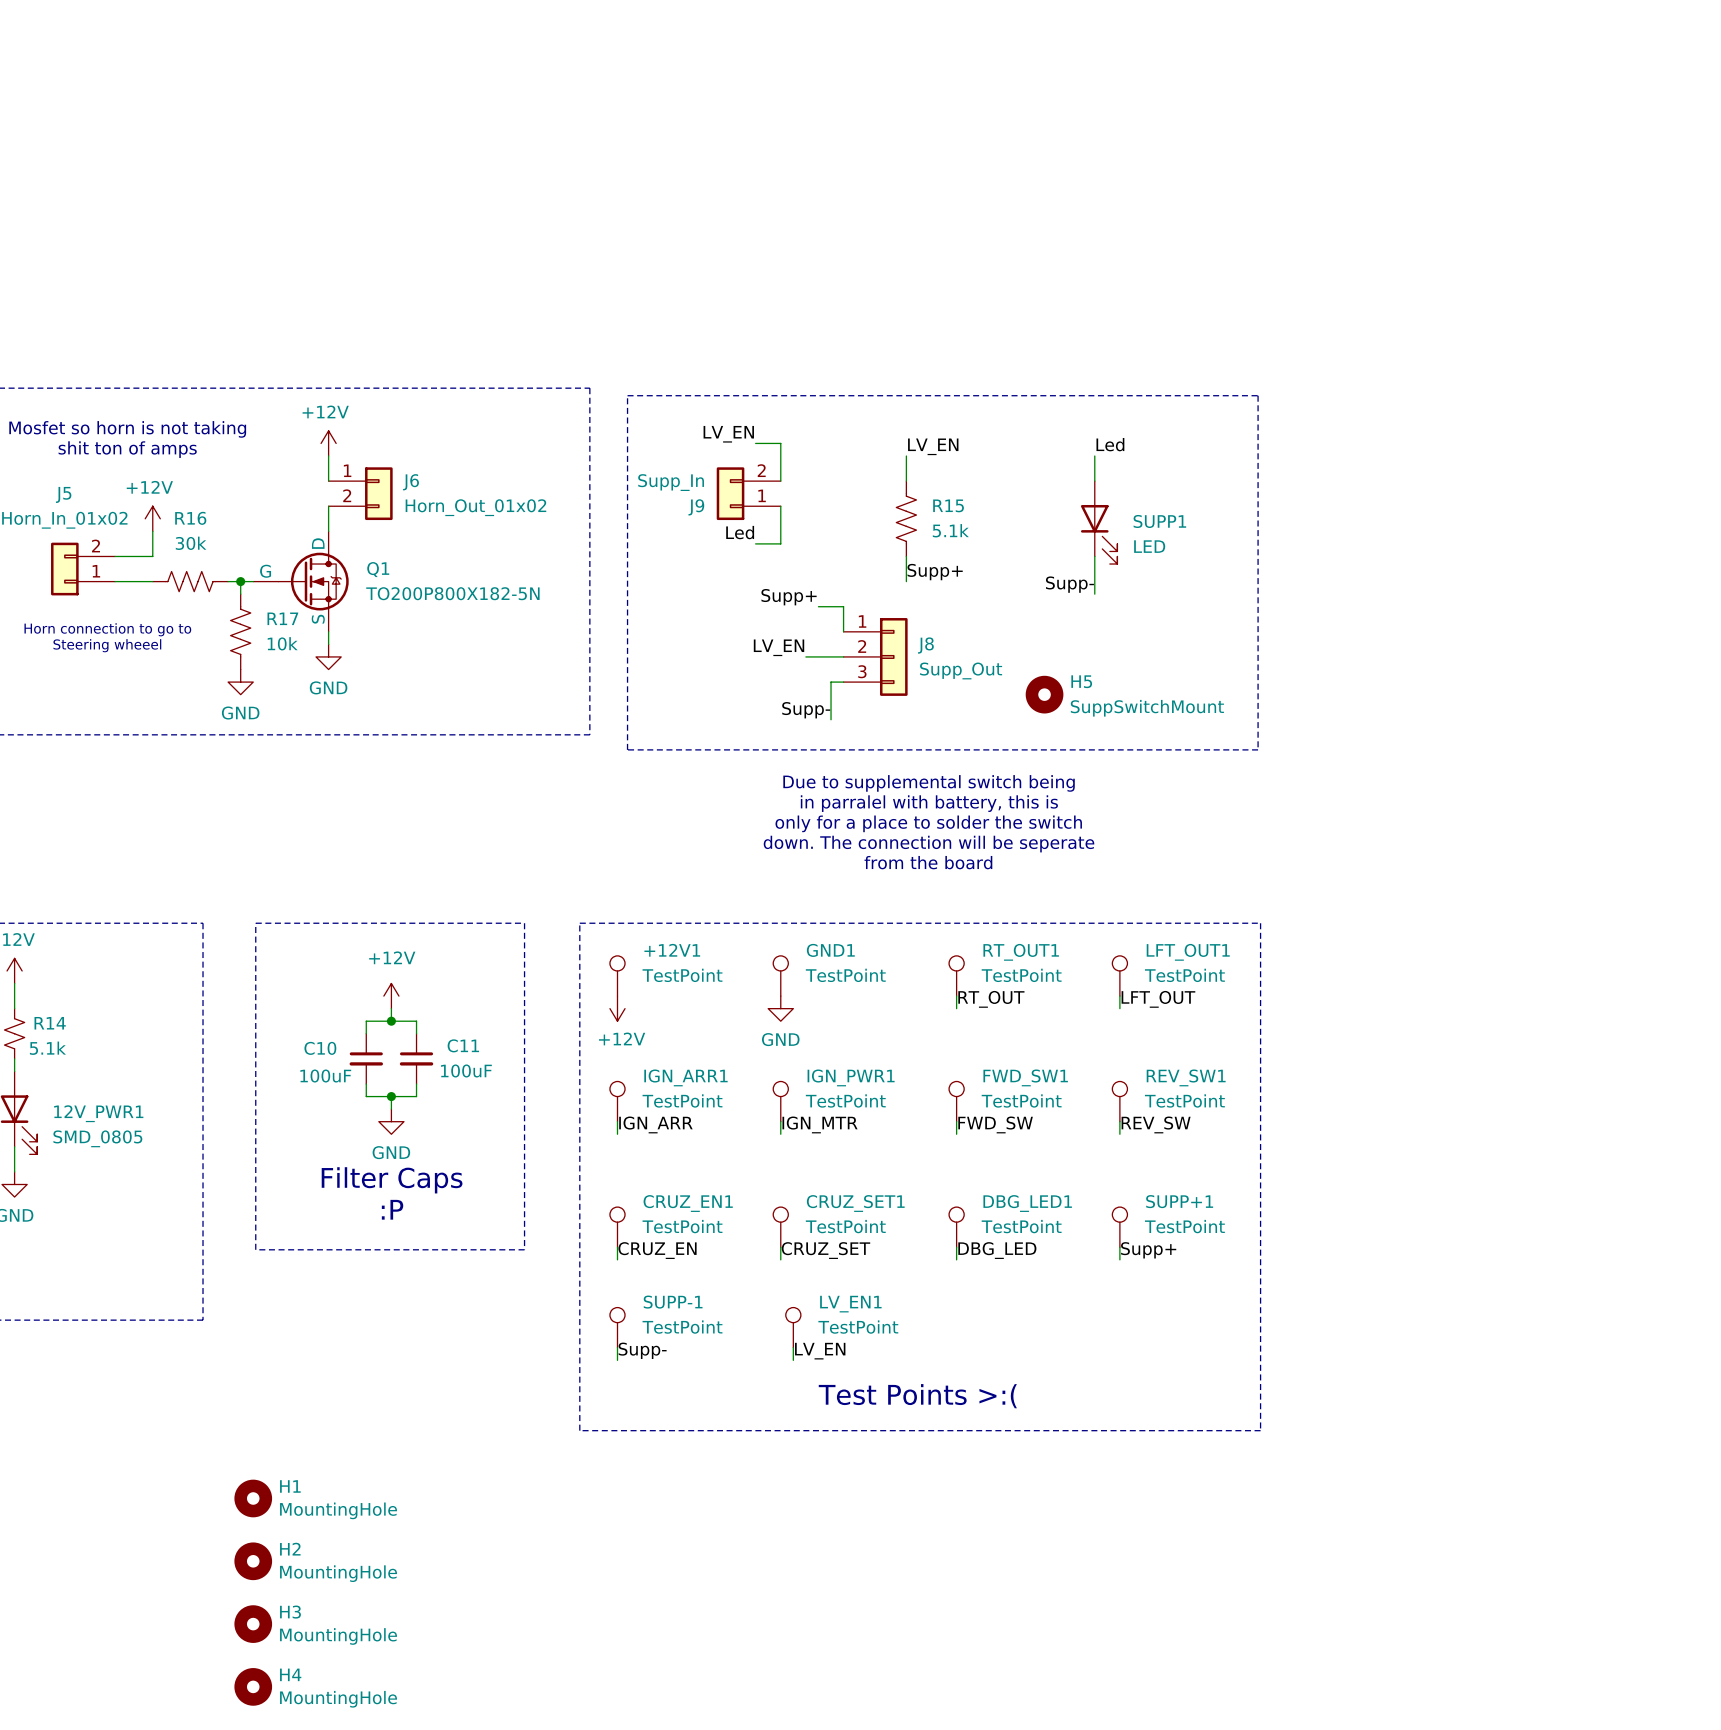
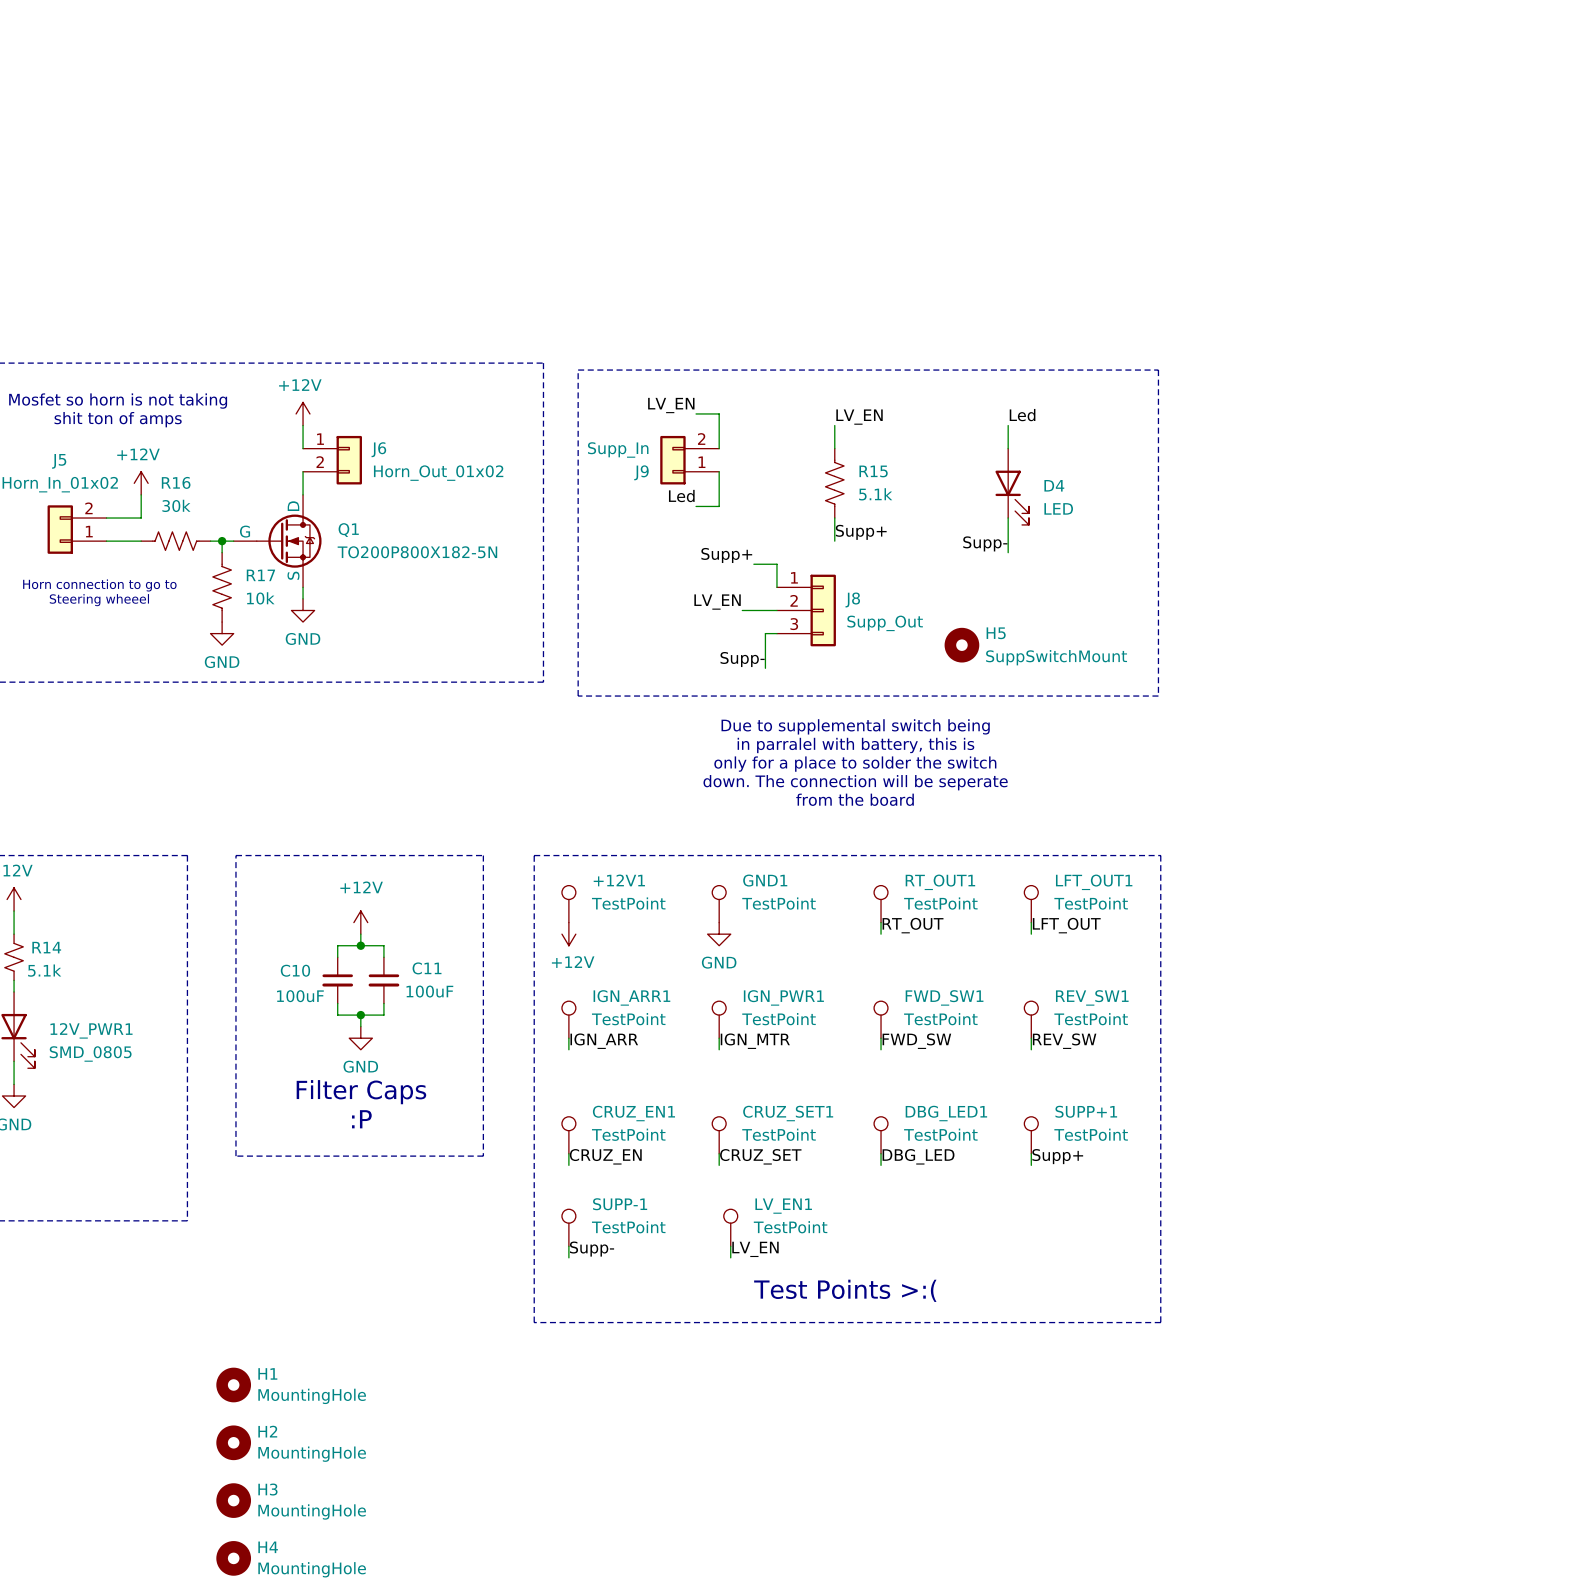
SUPP1 name: SUPP1 (1159, 521) -> D4 (1054, 485)

